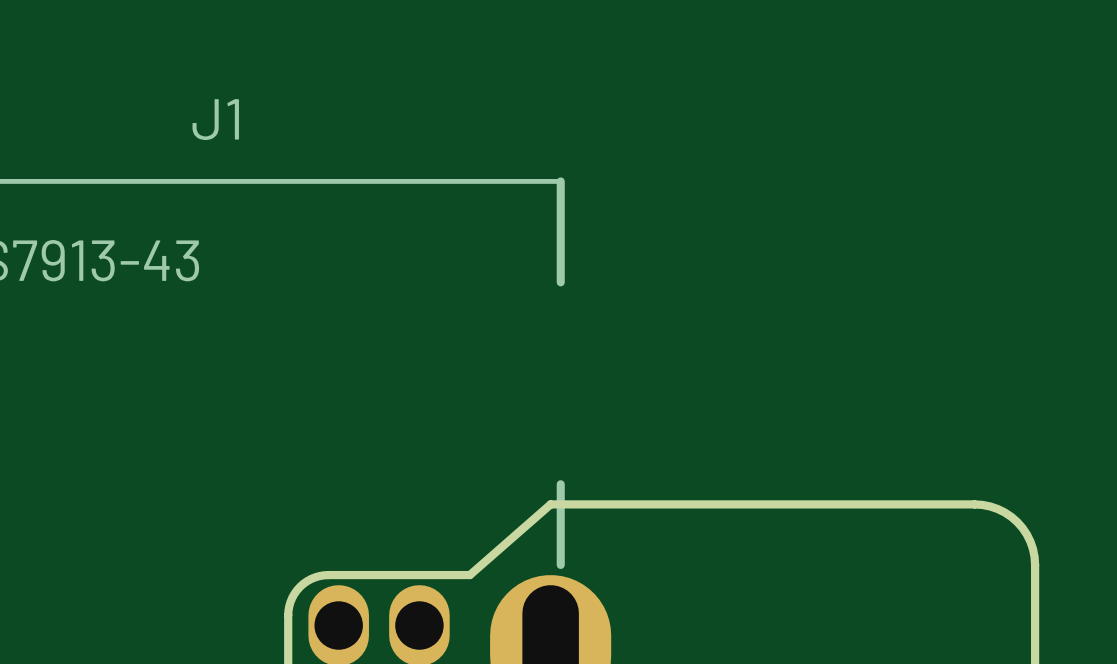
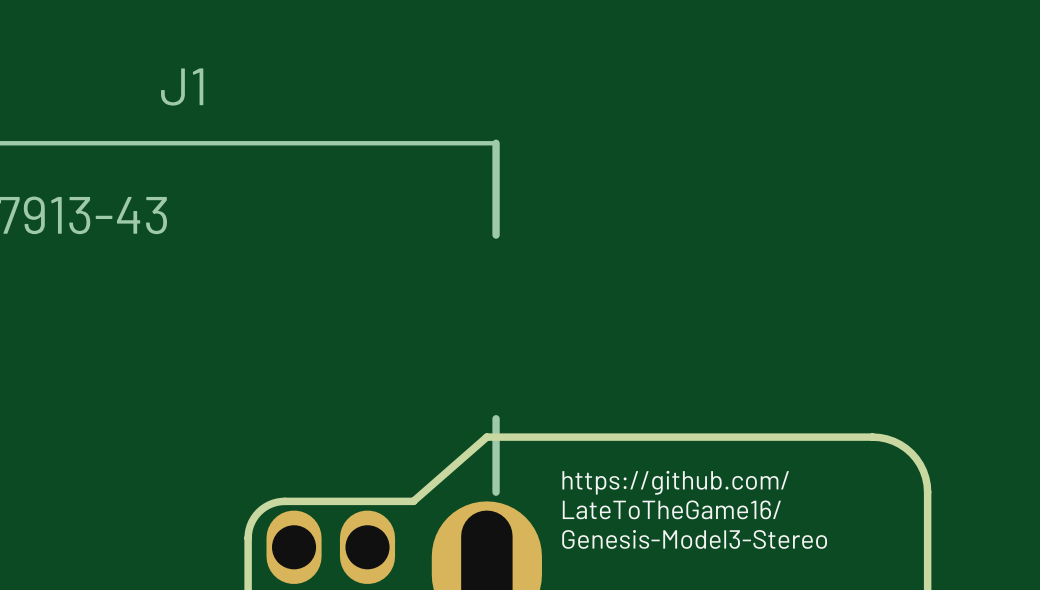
text: none -> https://github.com/ (675, 482)
text: none -> LateToTheGame16/ (671, 509)
text: none -> Genesis-Model3-Stereo (694, 539)

